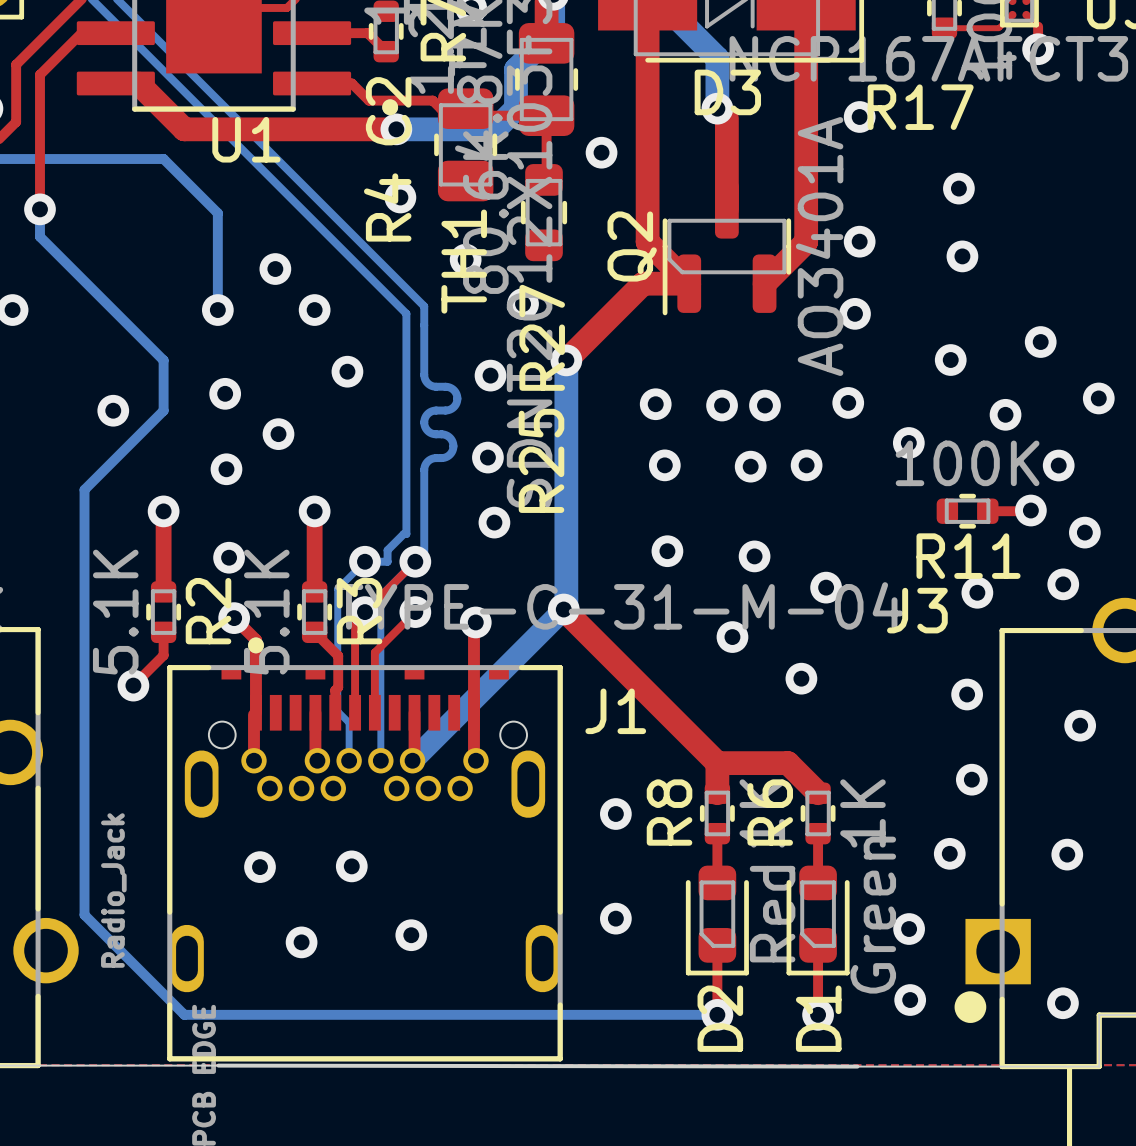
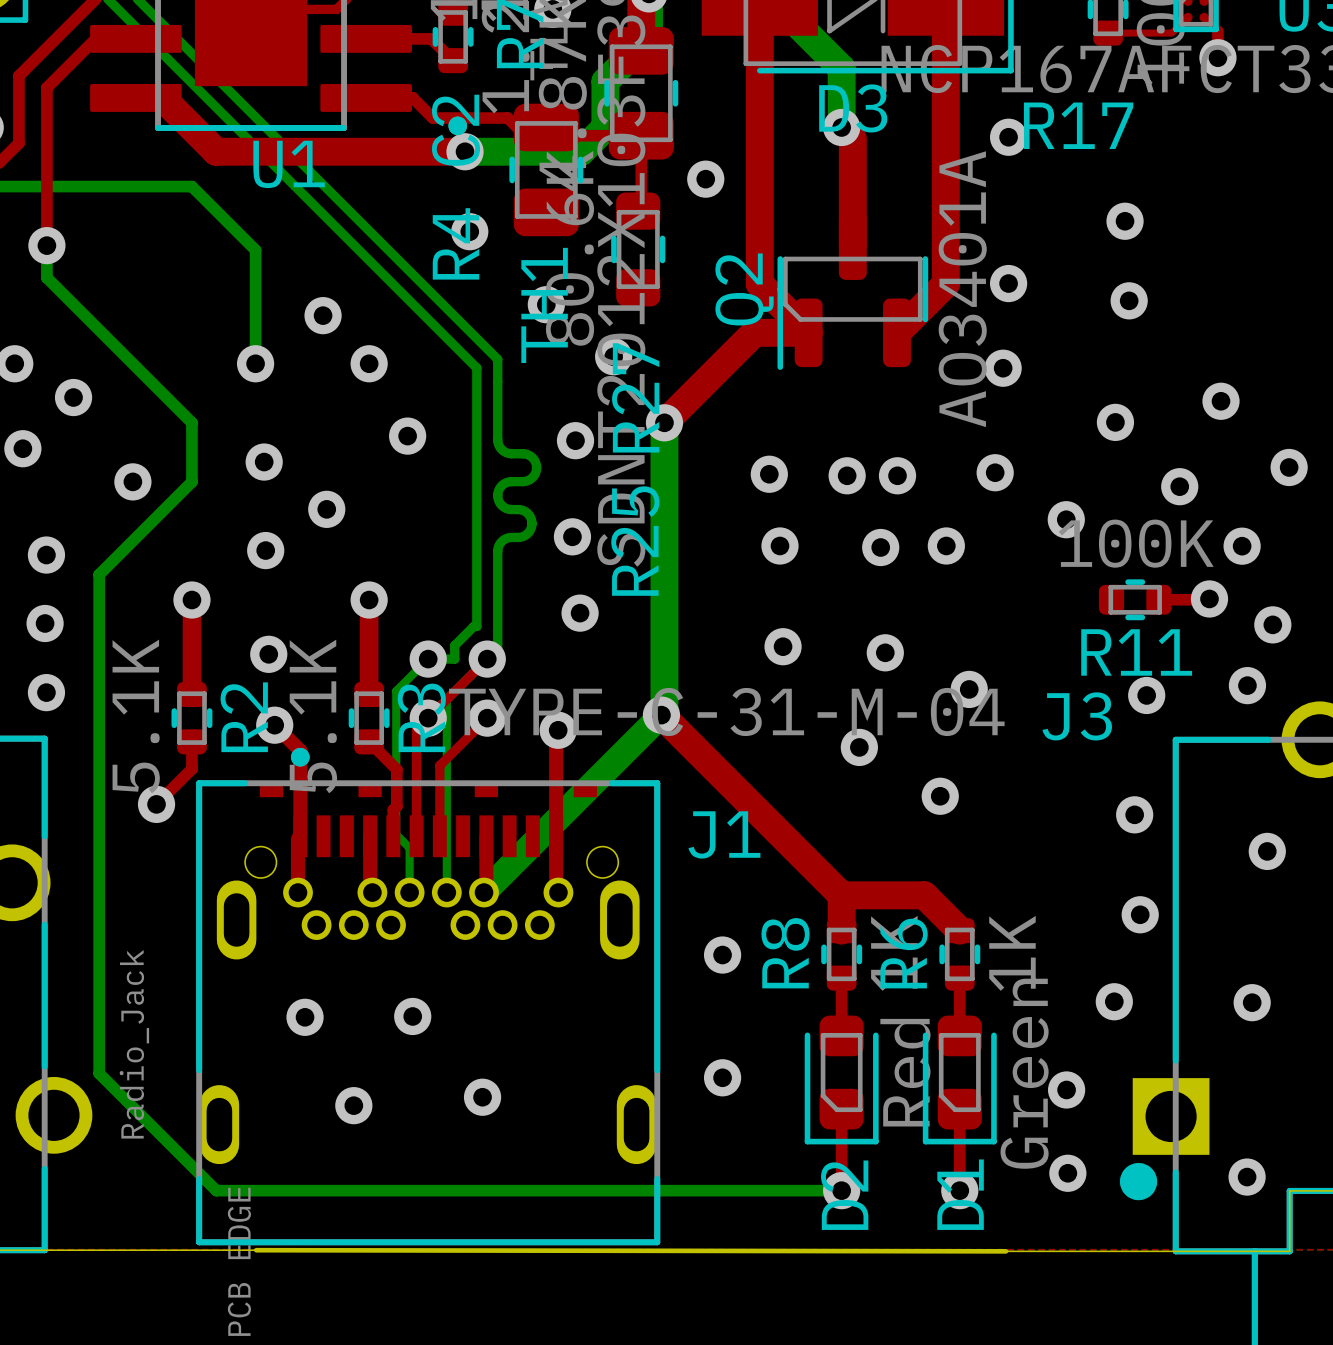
via: none -> (73, 397)
via: none -> (22, 448)
via: none -> (46, 555)
via: none -> (45, 623)
via: none -> (46, 692)

